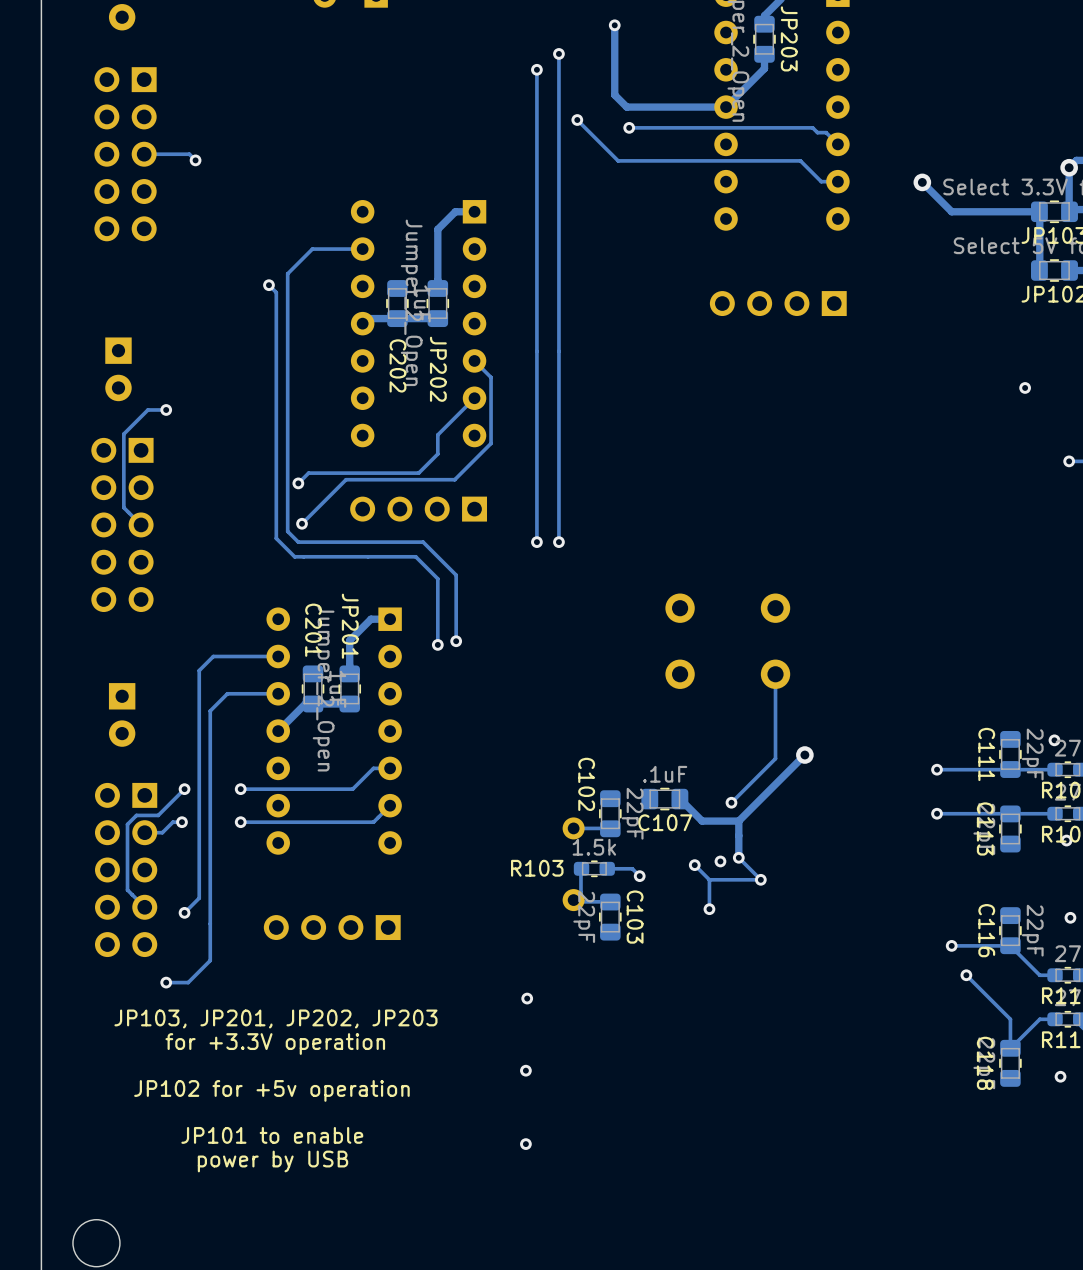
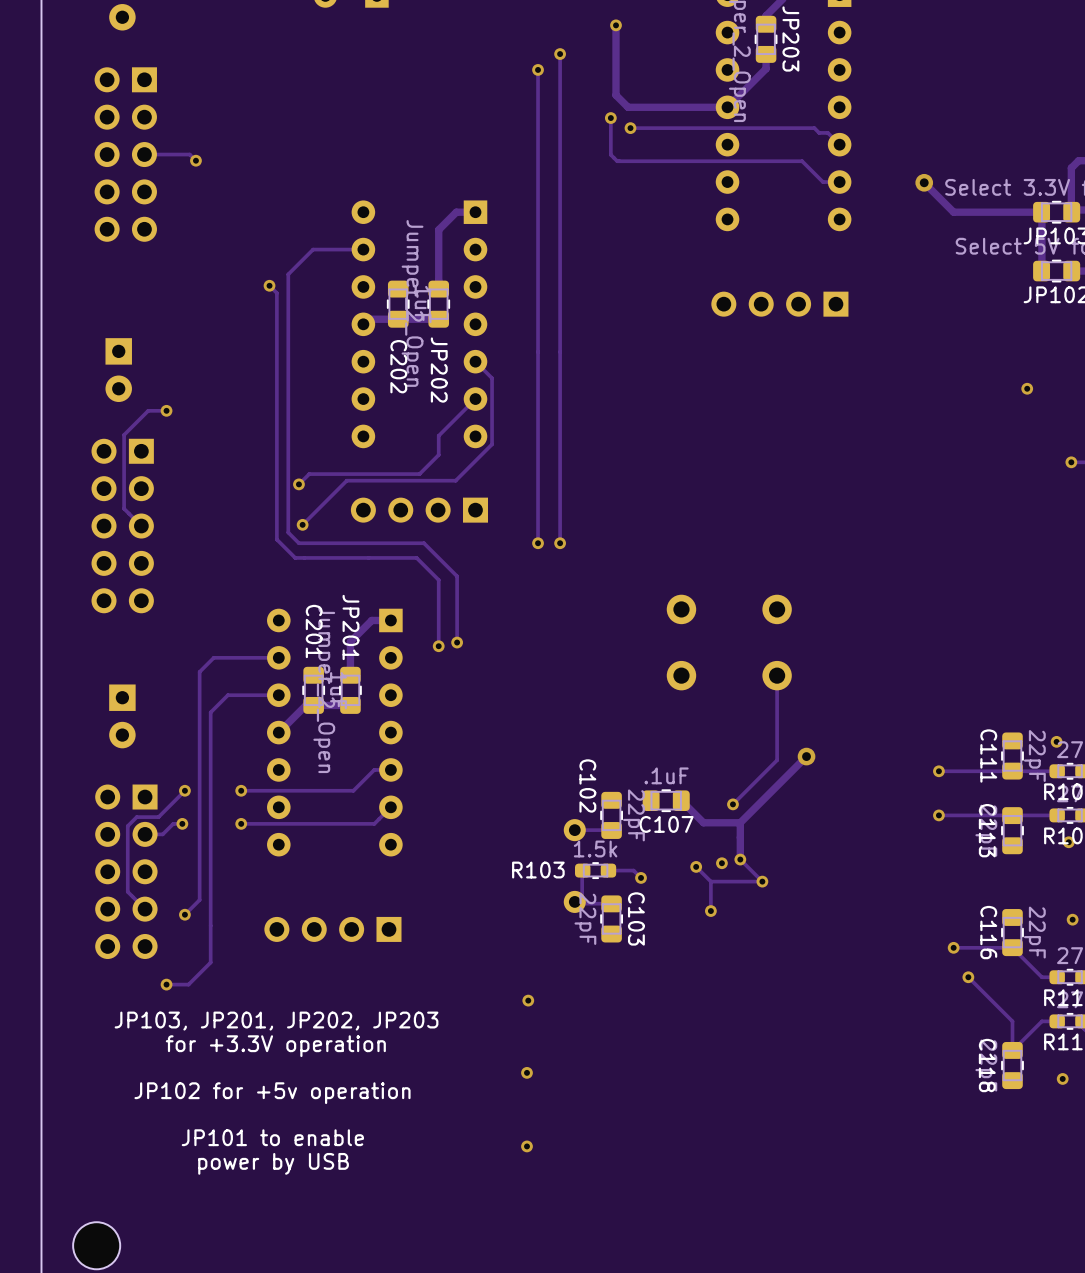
track: (577, 120) (618, 160) -> (610, 118) (610, 154) (619, 161)
via position: (577, 120) -> (610, 118)
via: (1069, 167) -> none

